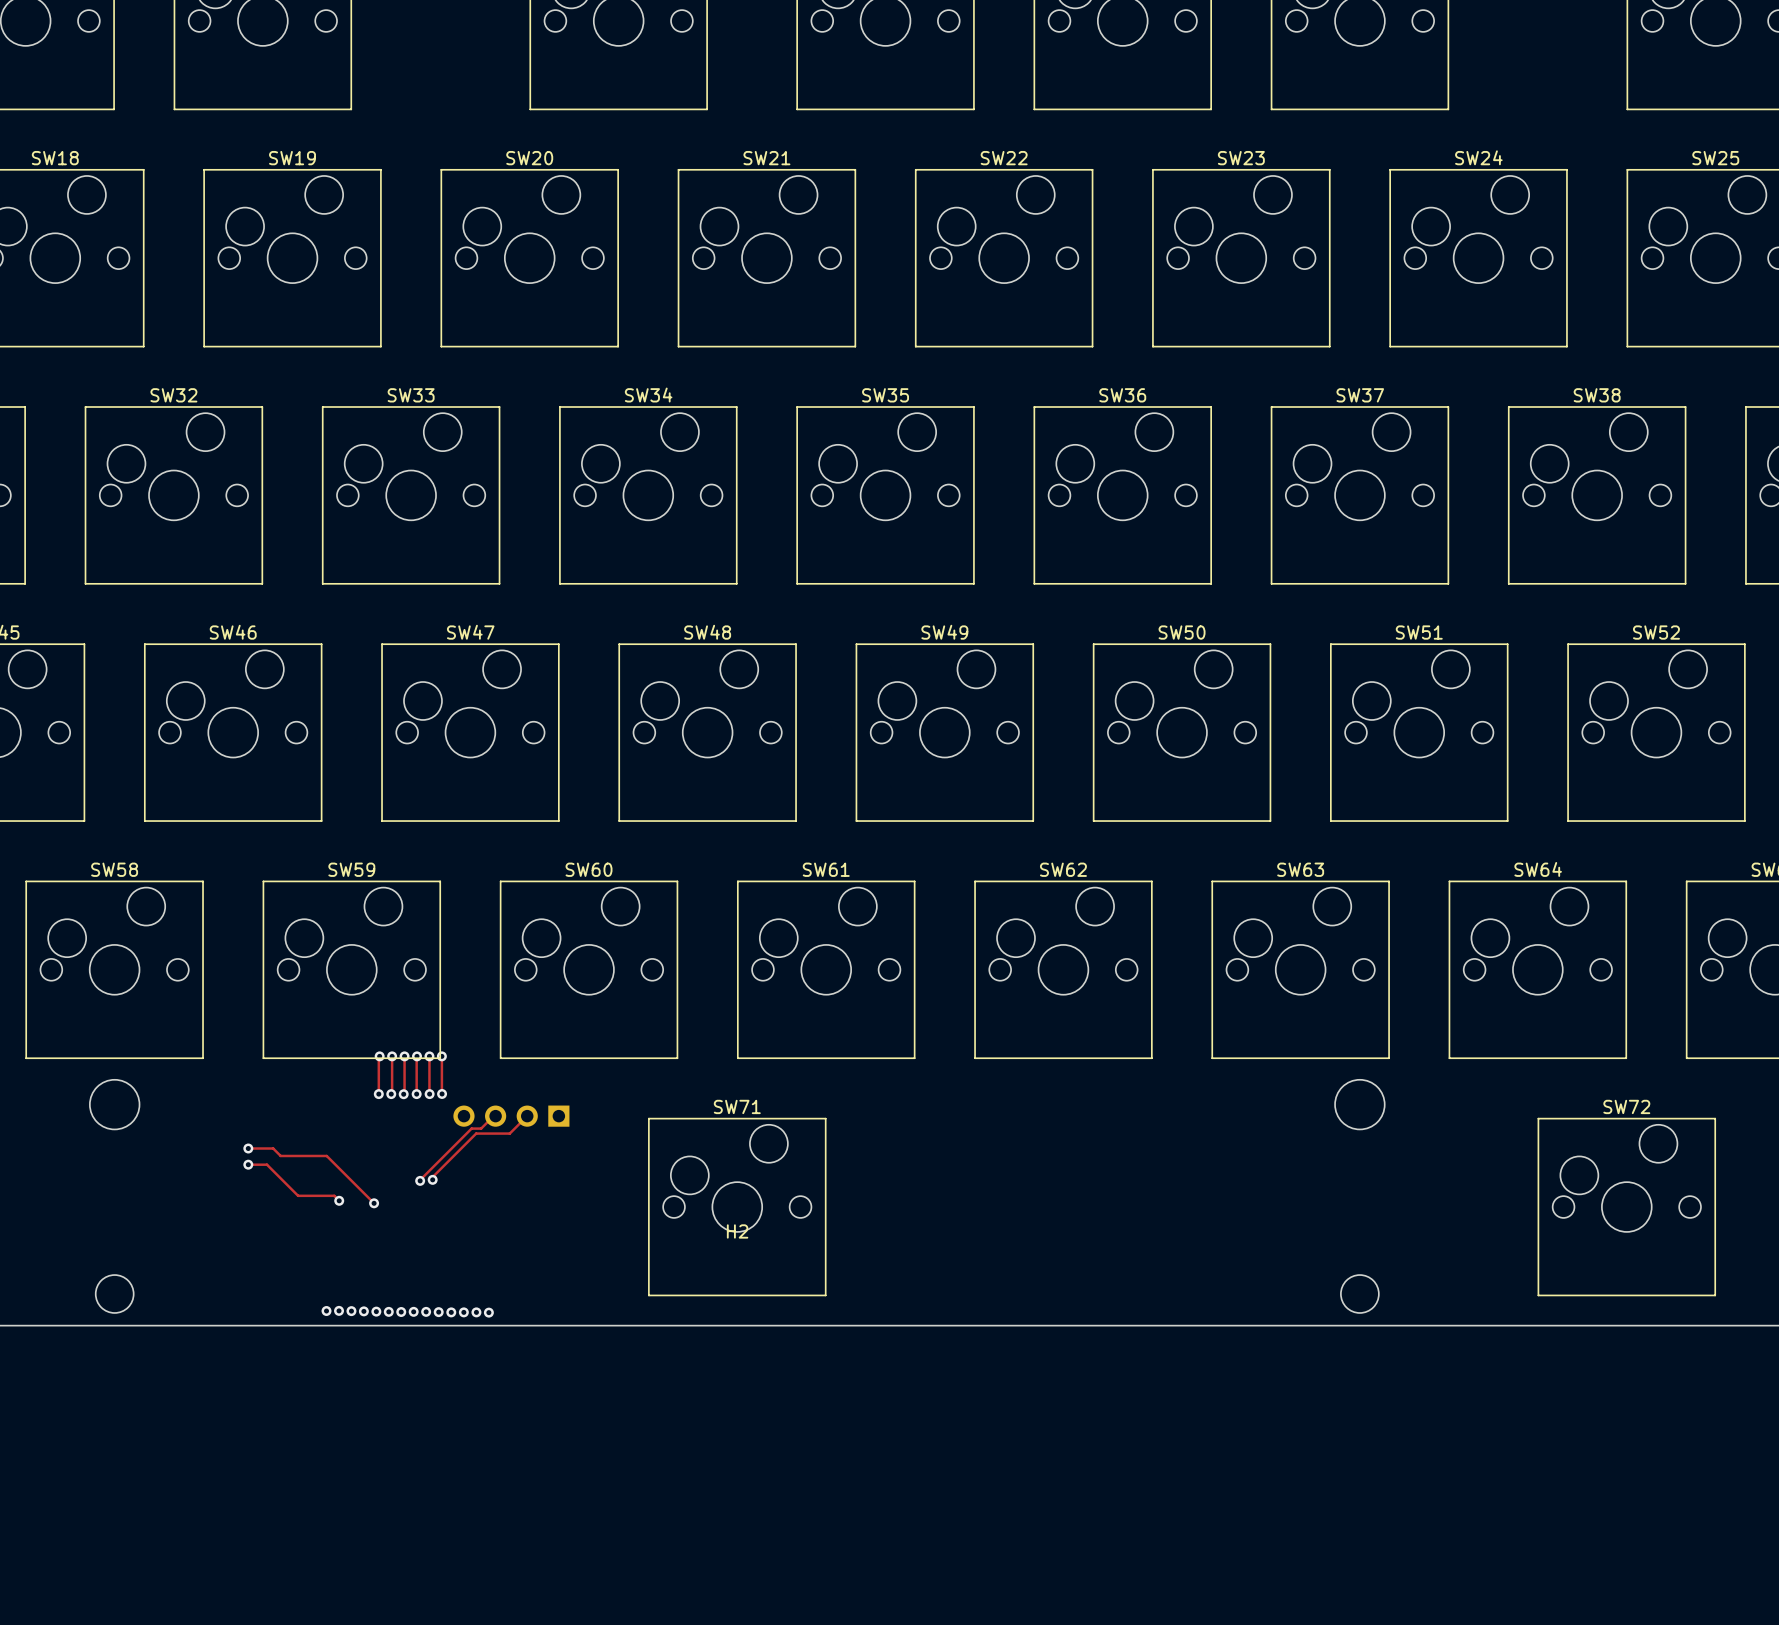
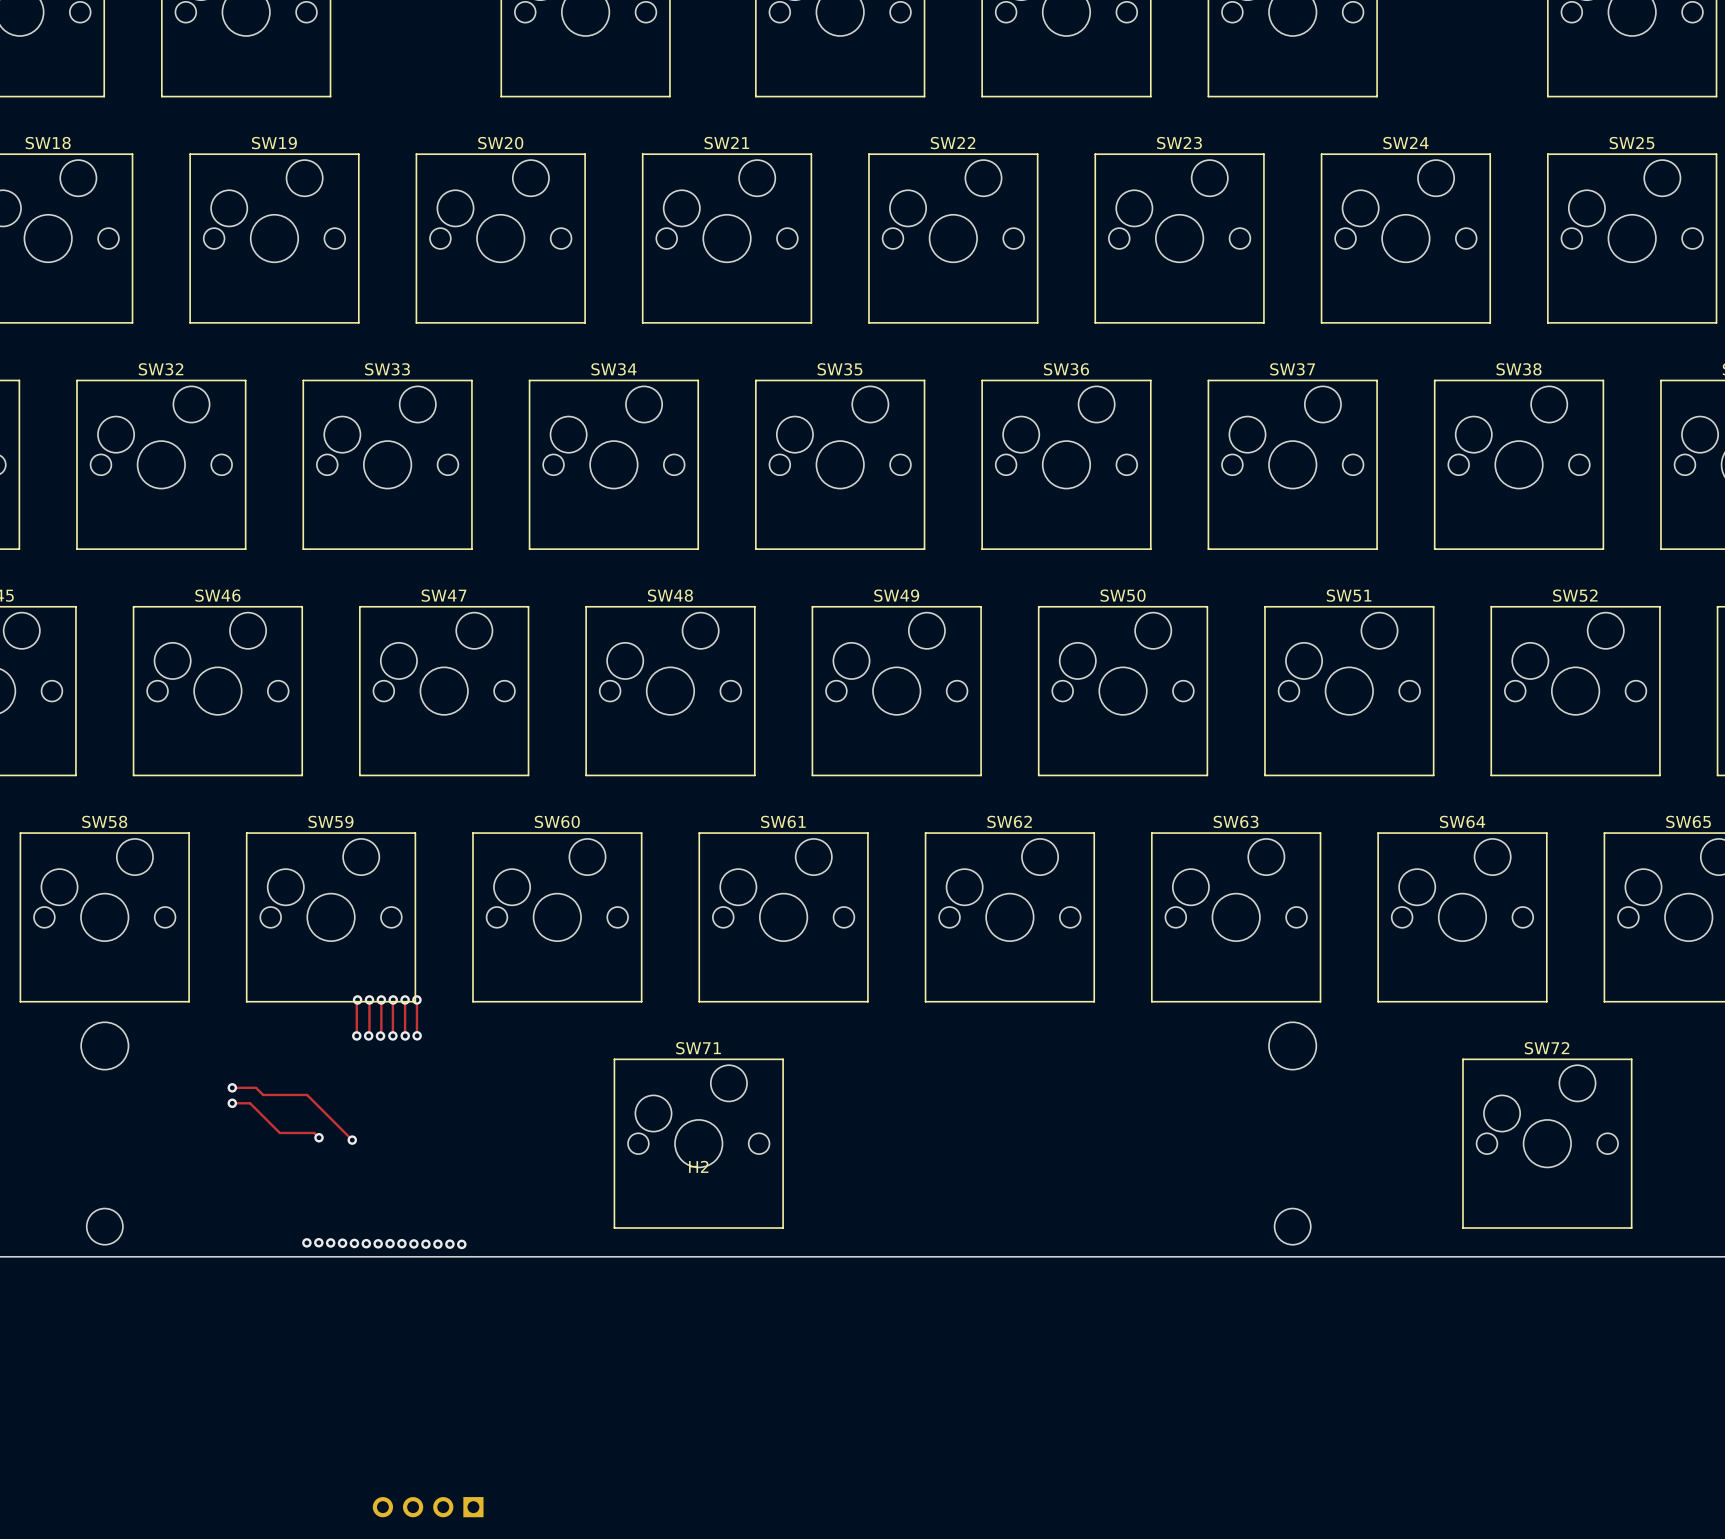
track: (495, 1116) (481, 1128) (471, 1128) (420, 1180) -> none
part: (511, 1116) -> none
track: (527, 1116) (509, 1133) (476, 1133) (432, 1177) (432, 1179) -> none
via: (432, 1179) -> none
via: (420, 1180) -> none
part: none -> (428, 1507)

